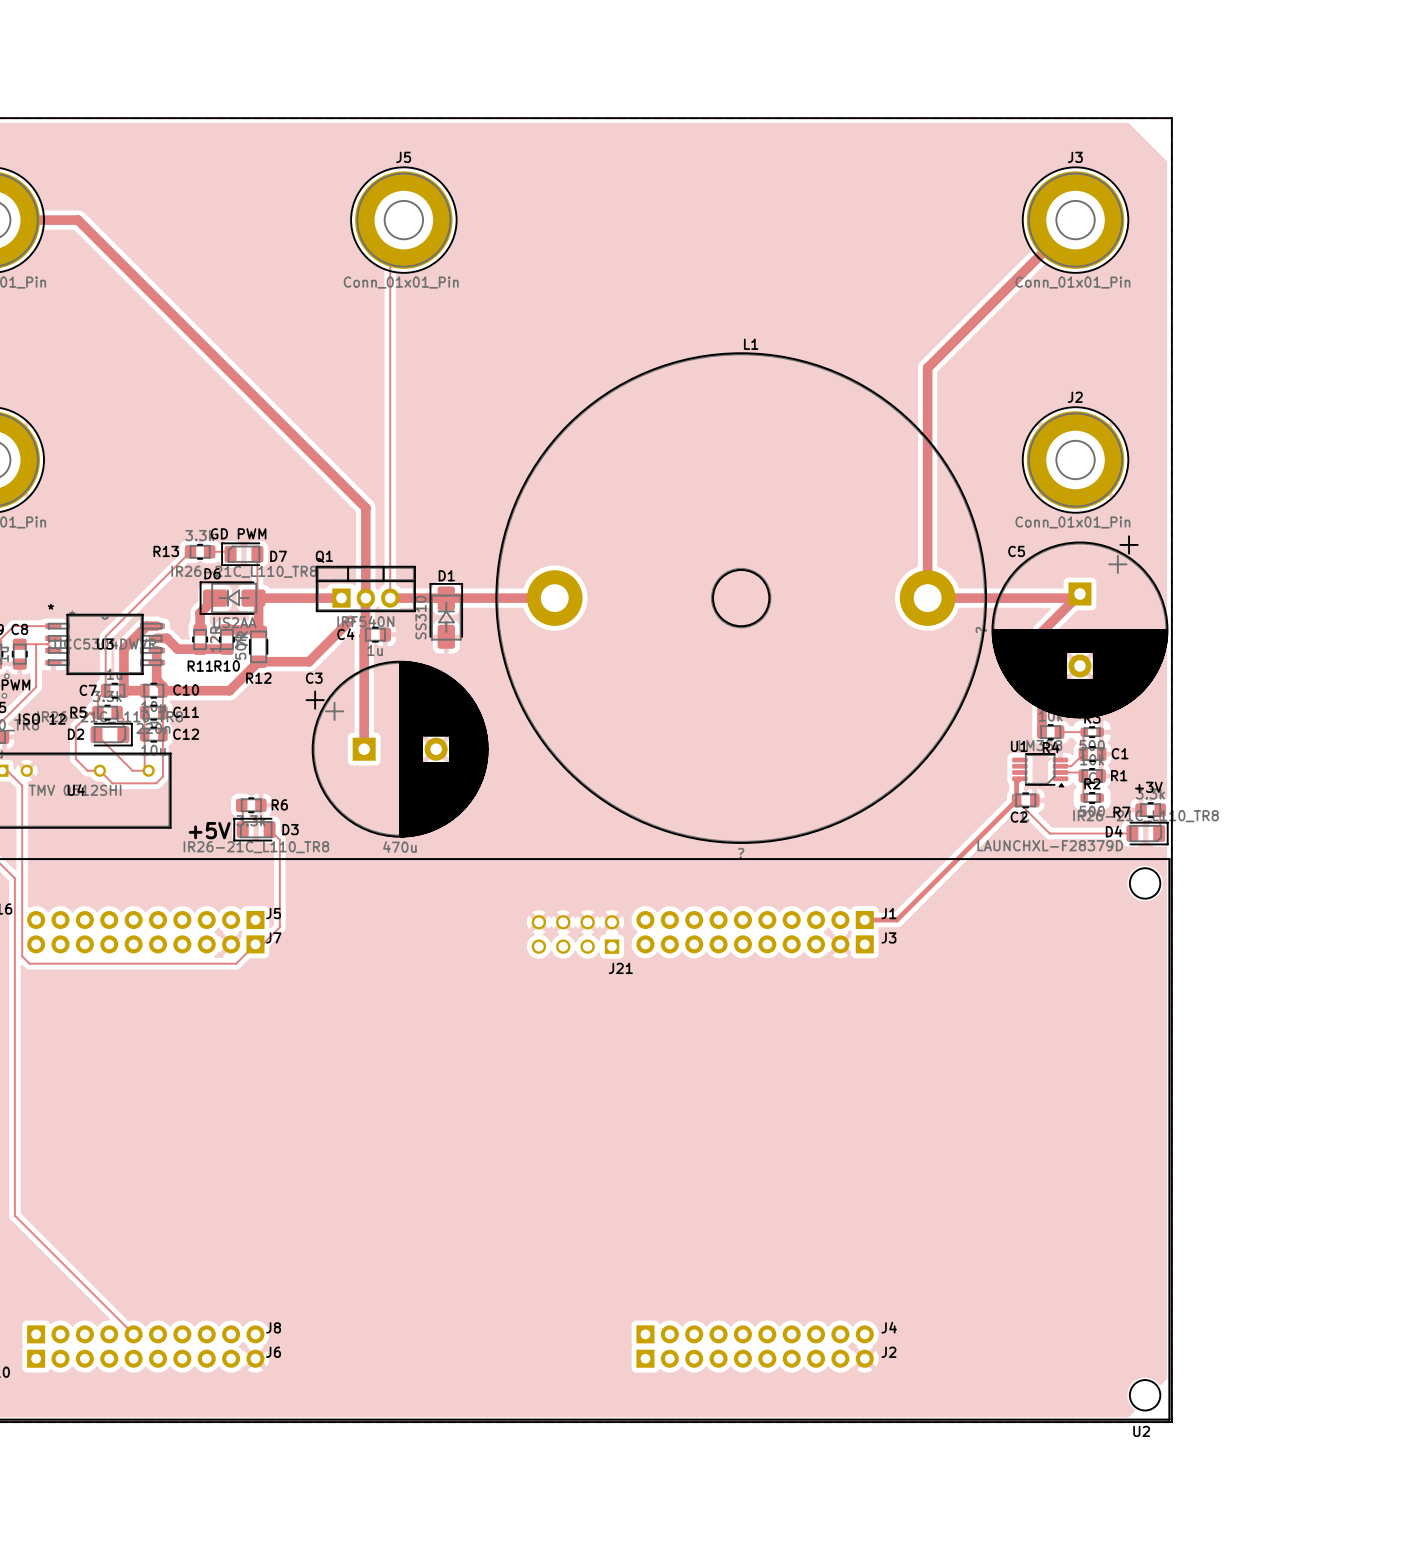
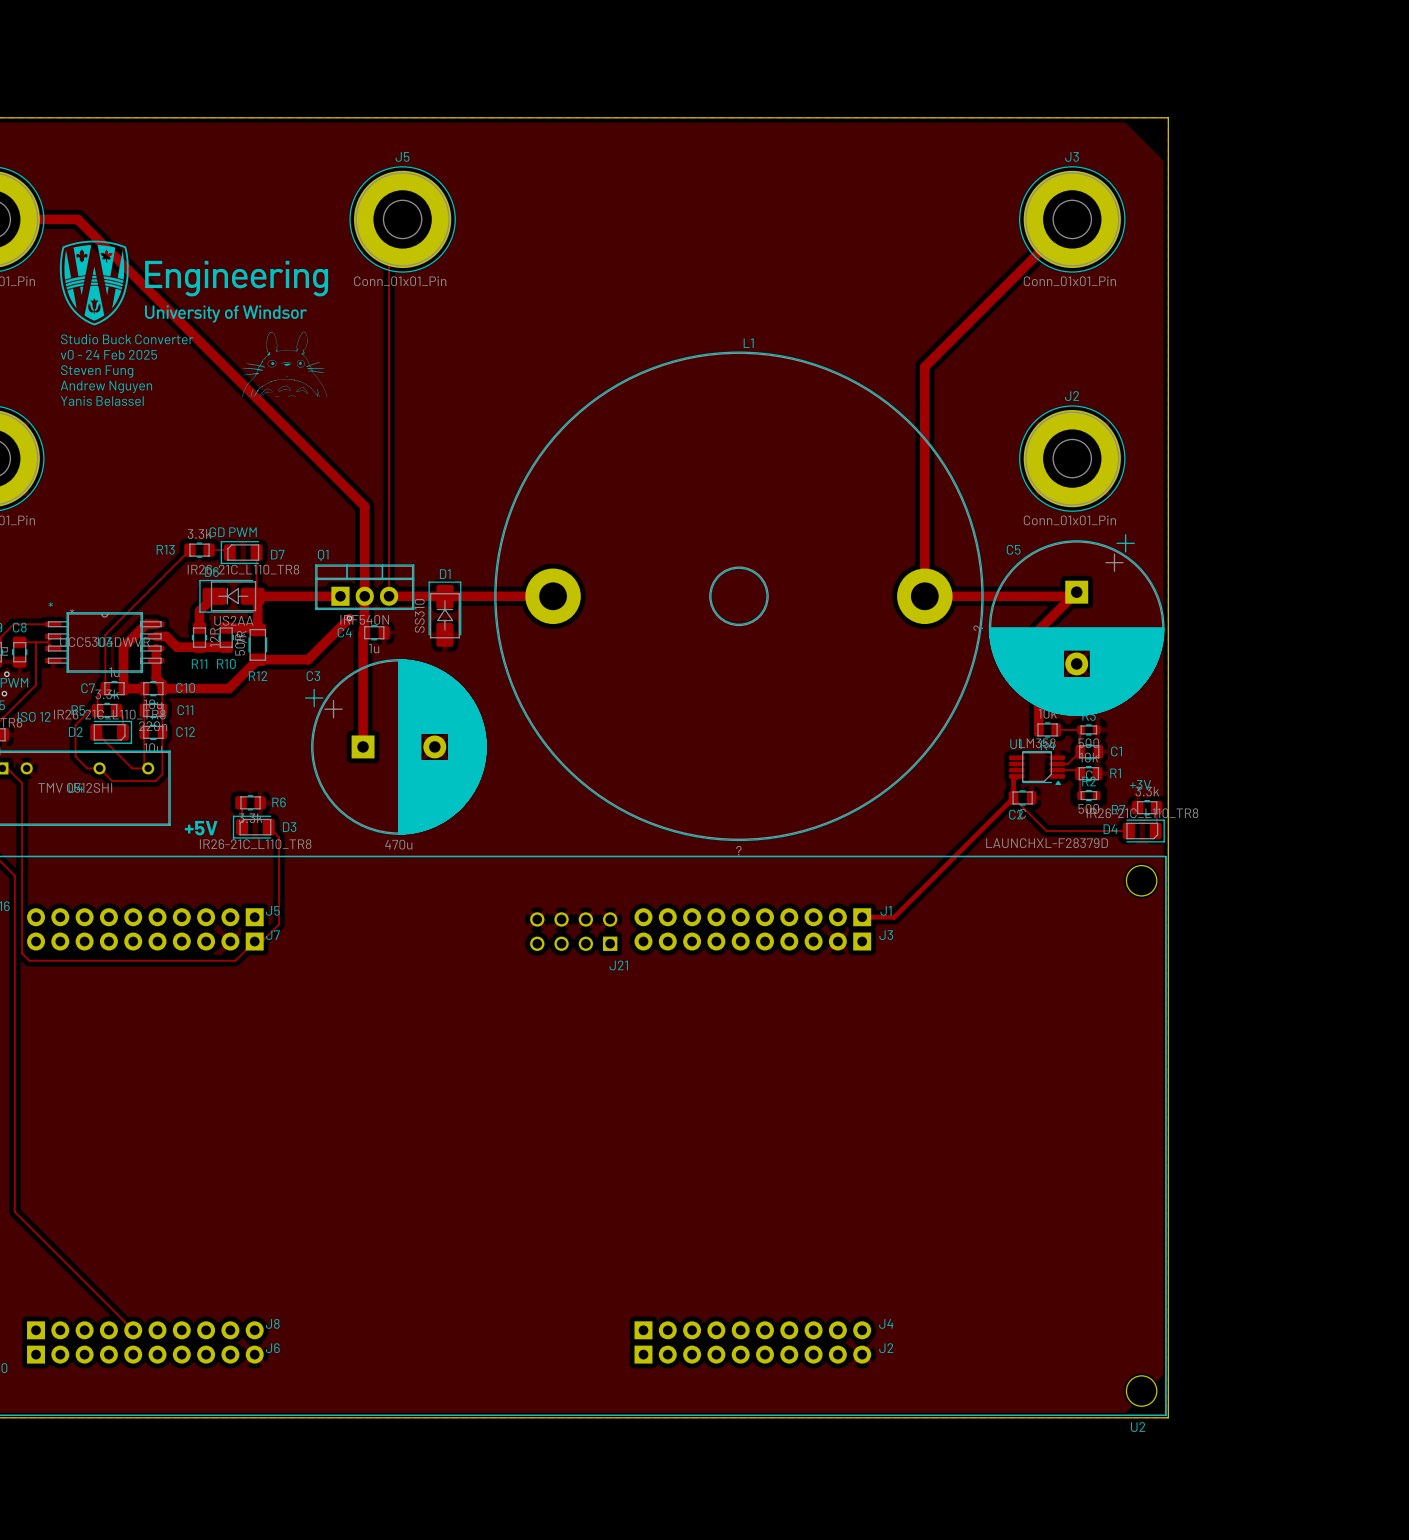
drawing: none -> [59, 240, 329, 398]
text: none -> Studio Buck Converter (127, 339)
text: none -> v0 - 24 Feb 2025 (108, 354)
text: none -> Steven Fung (97, 371)
text: none -> Andrew Nguyen (106, 386)
text: none -> Yanis Belassel (102, 400)

